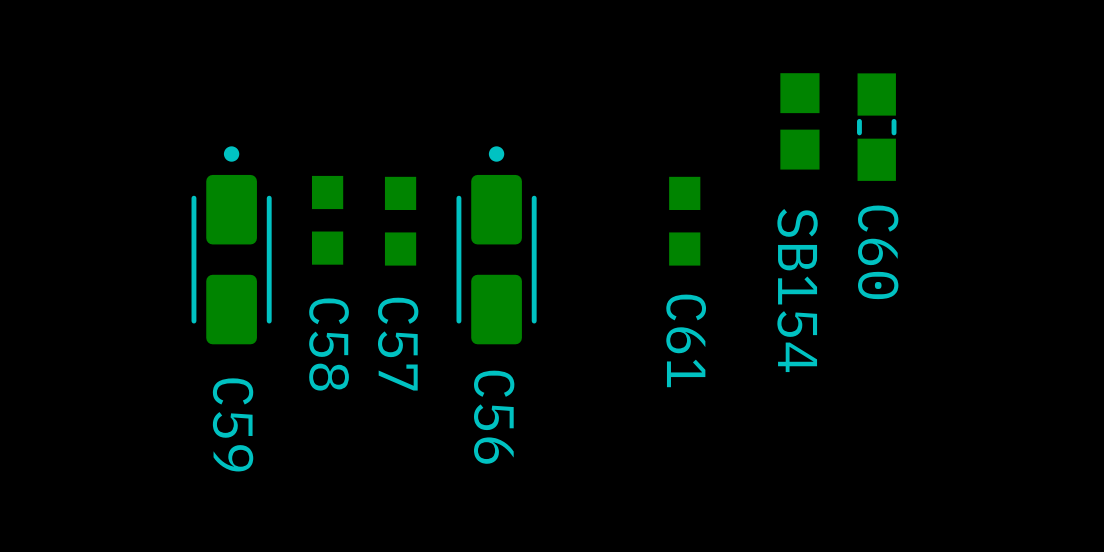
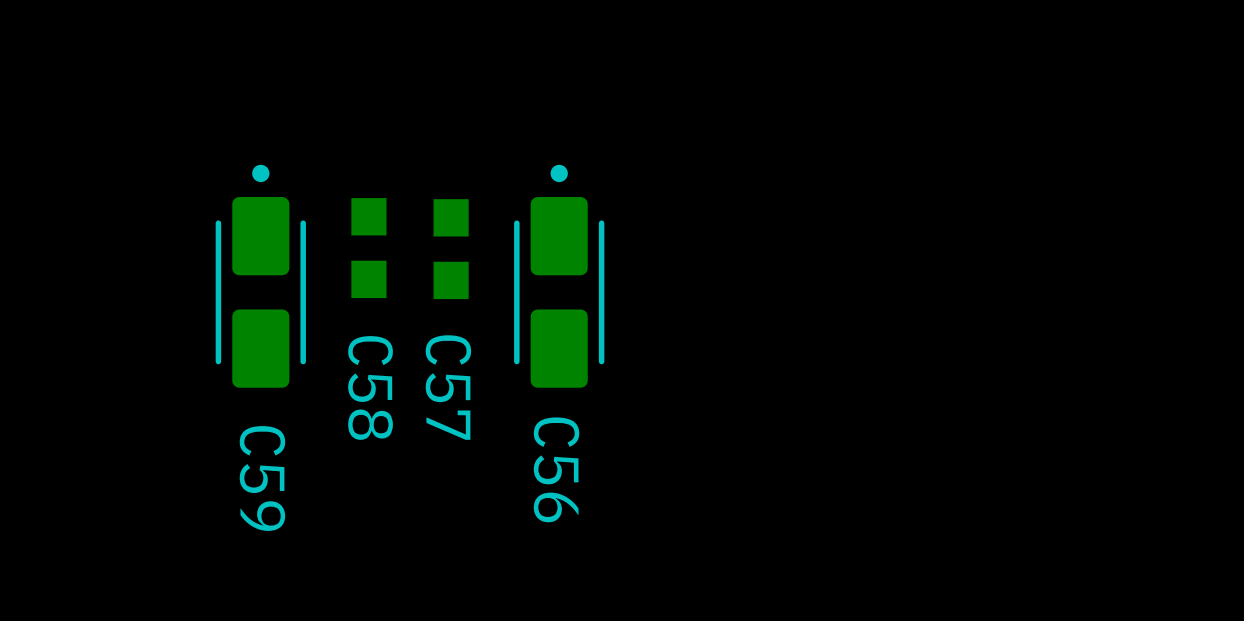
SB154: (799, 121) -> none
C60: (876, 127) -> none
C61: (684, 221) -> none

